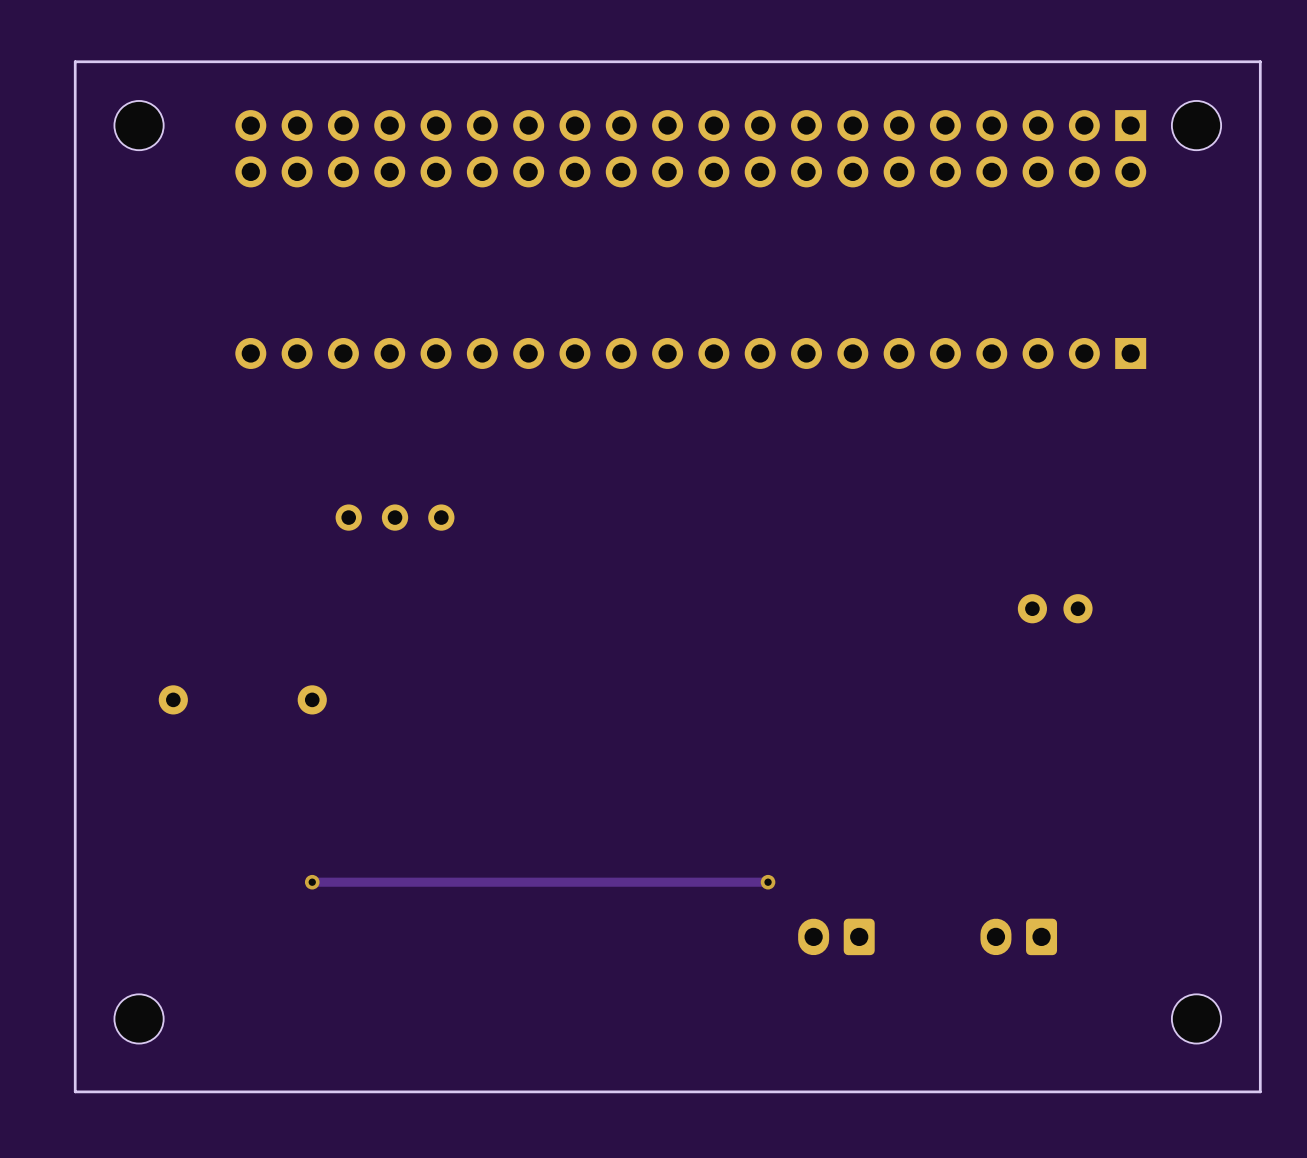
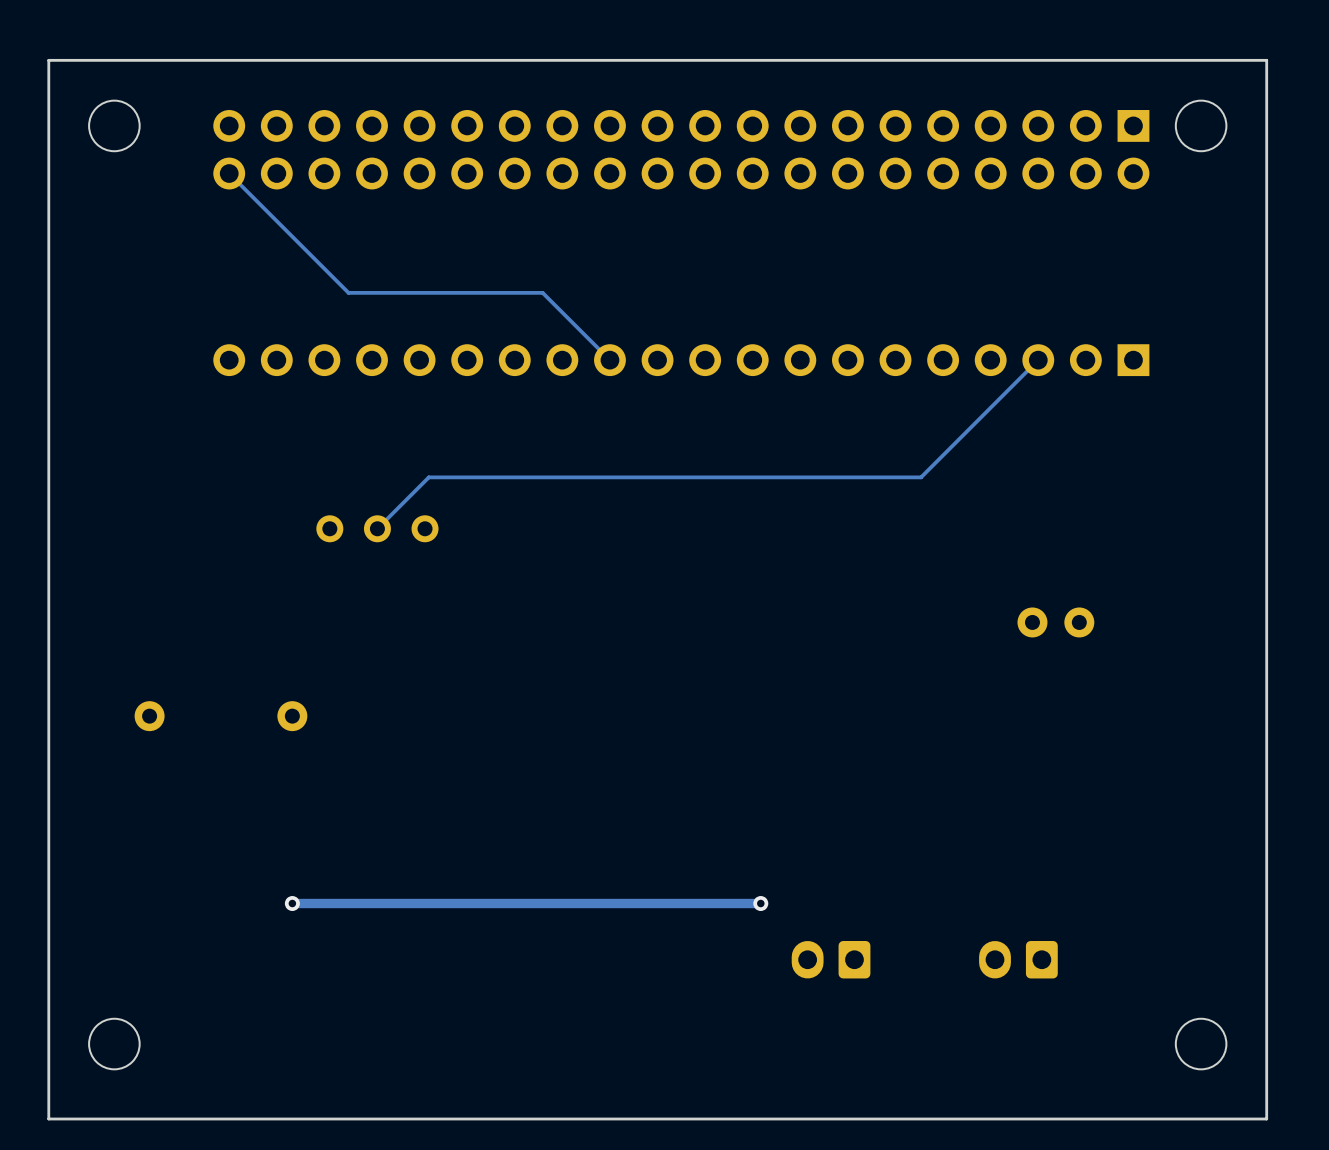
track: none -> (229, 173) (348, 292) (542, 292) (609, 360)
track: none -> (1038, 360) (921, 477) (428, 477) (377, 528)

